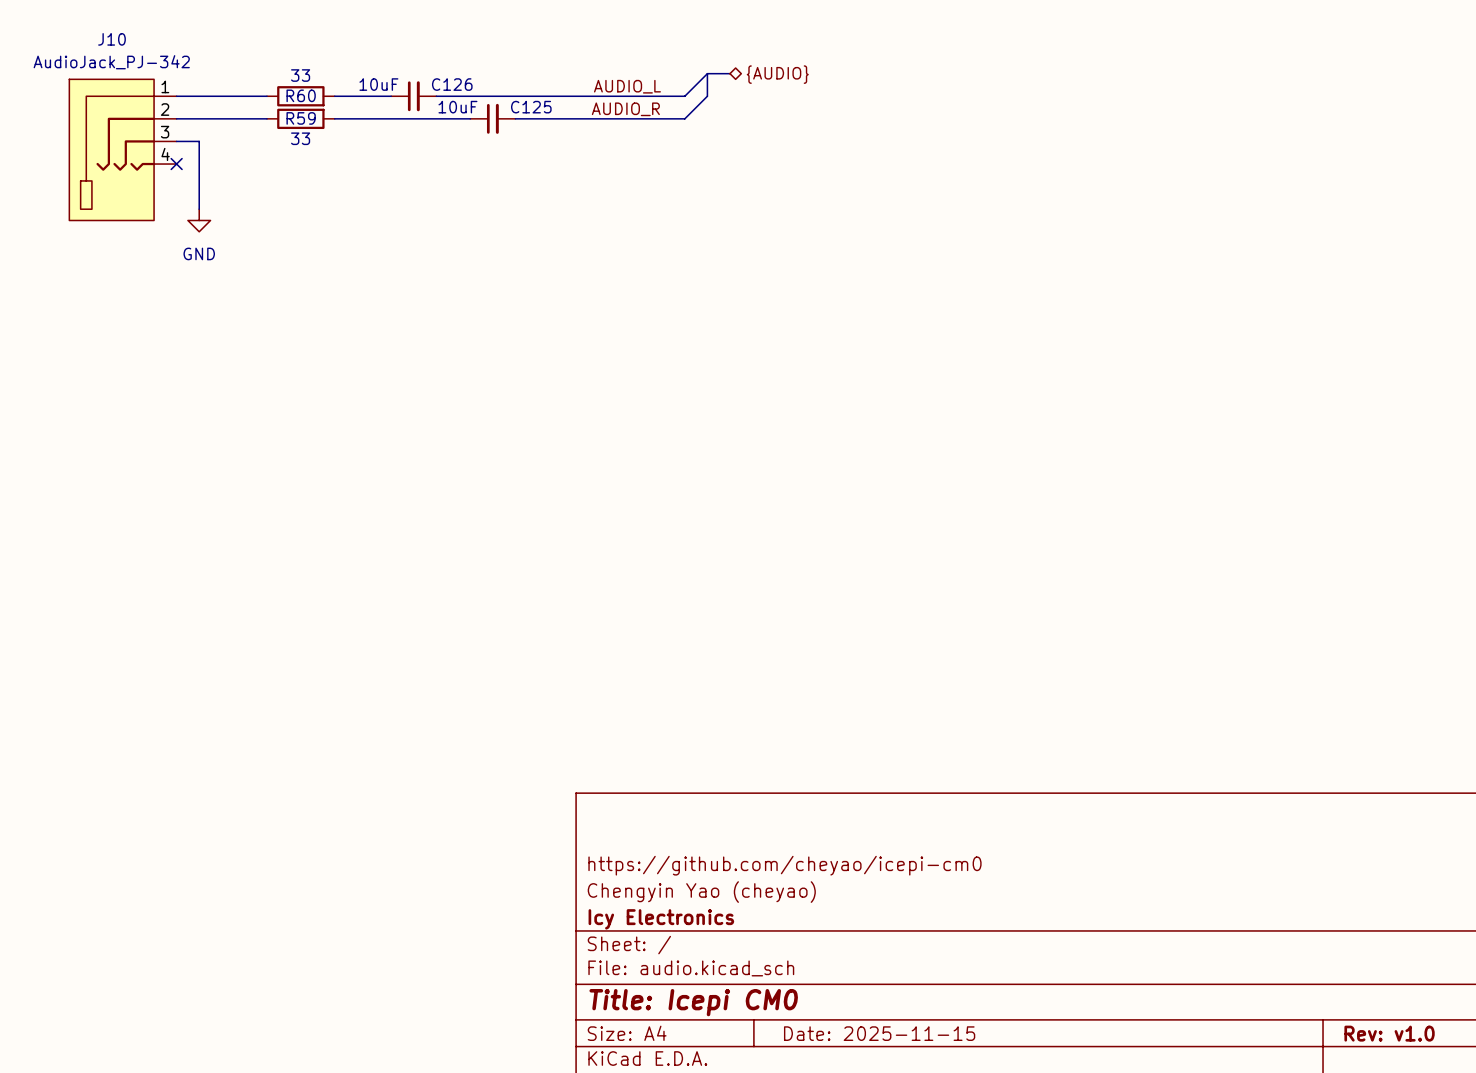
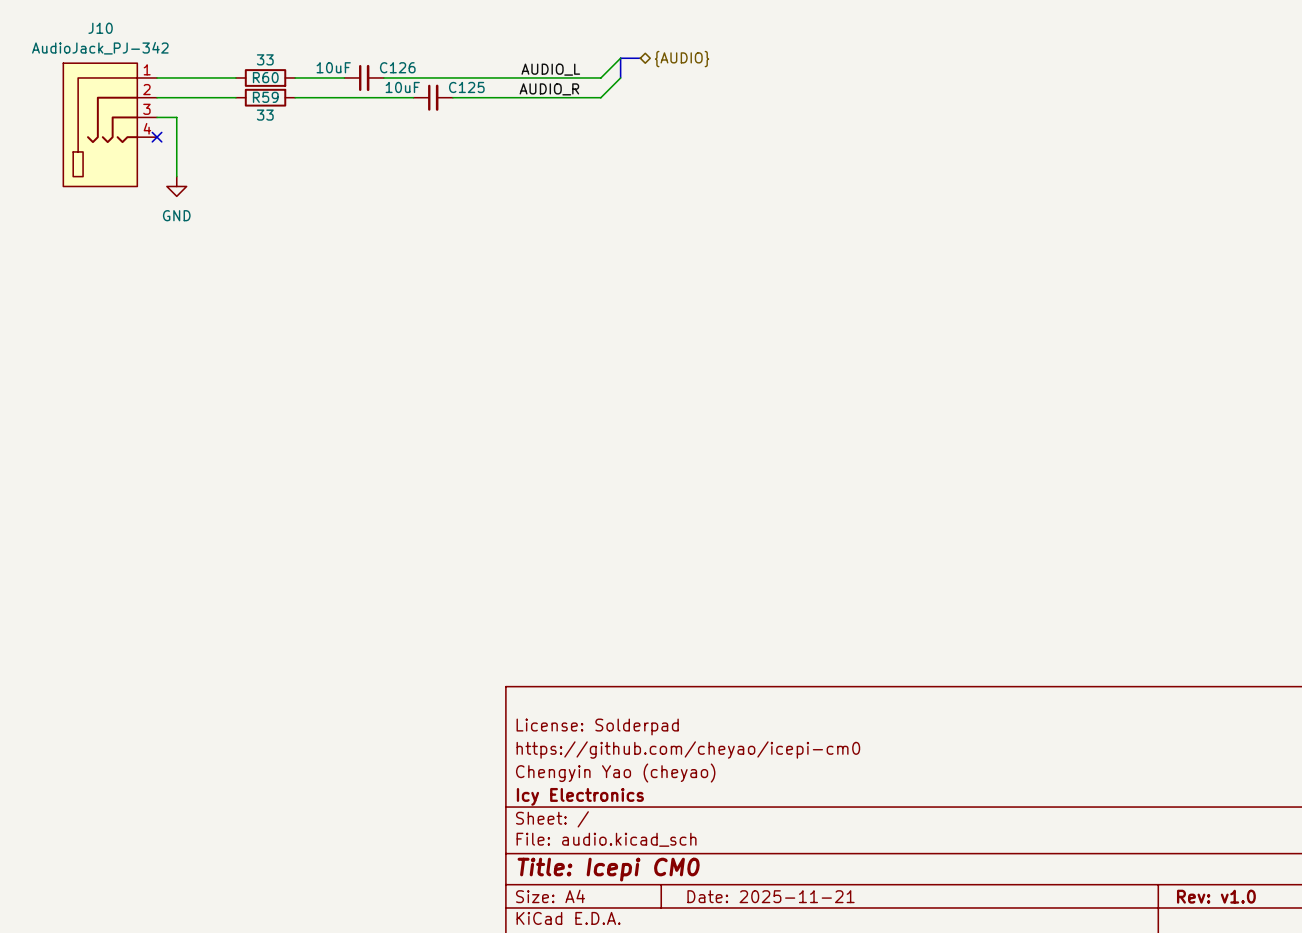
title block: none -> License: Solderpad (597, 726)
title block: Date: 2025-11-15 (879, 1033) -> Date: 2025-11-21 (771, 896)

